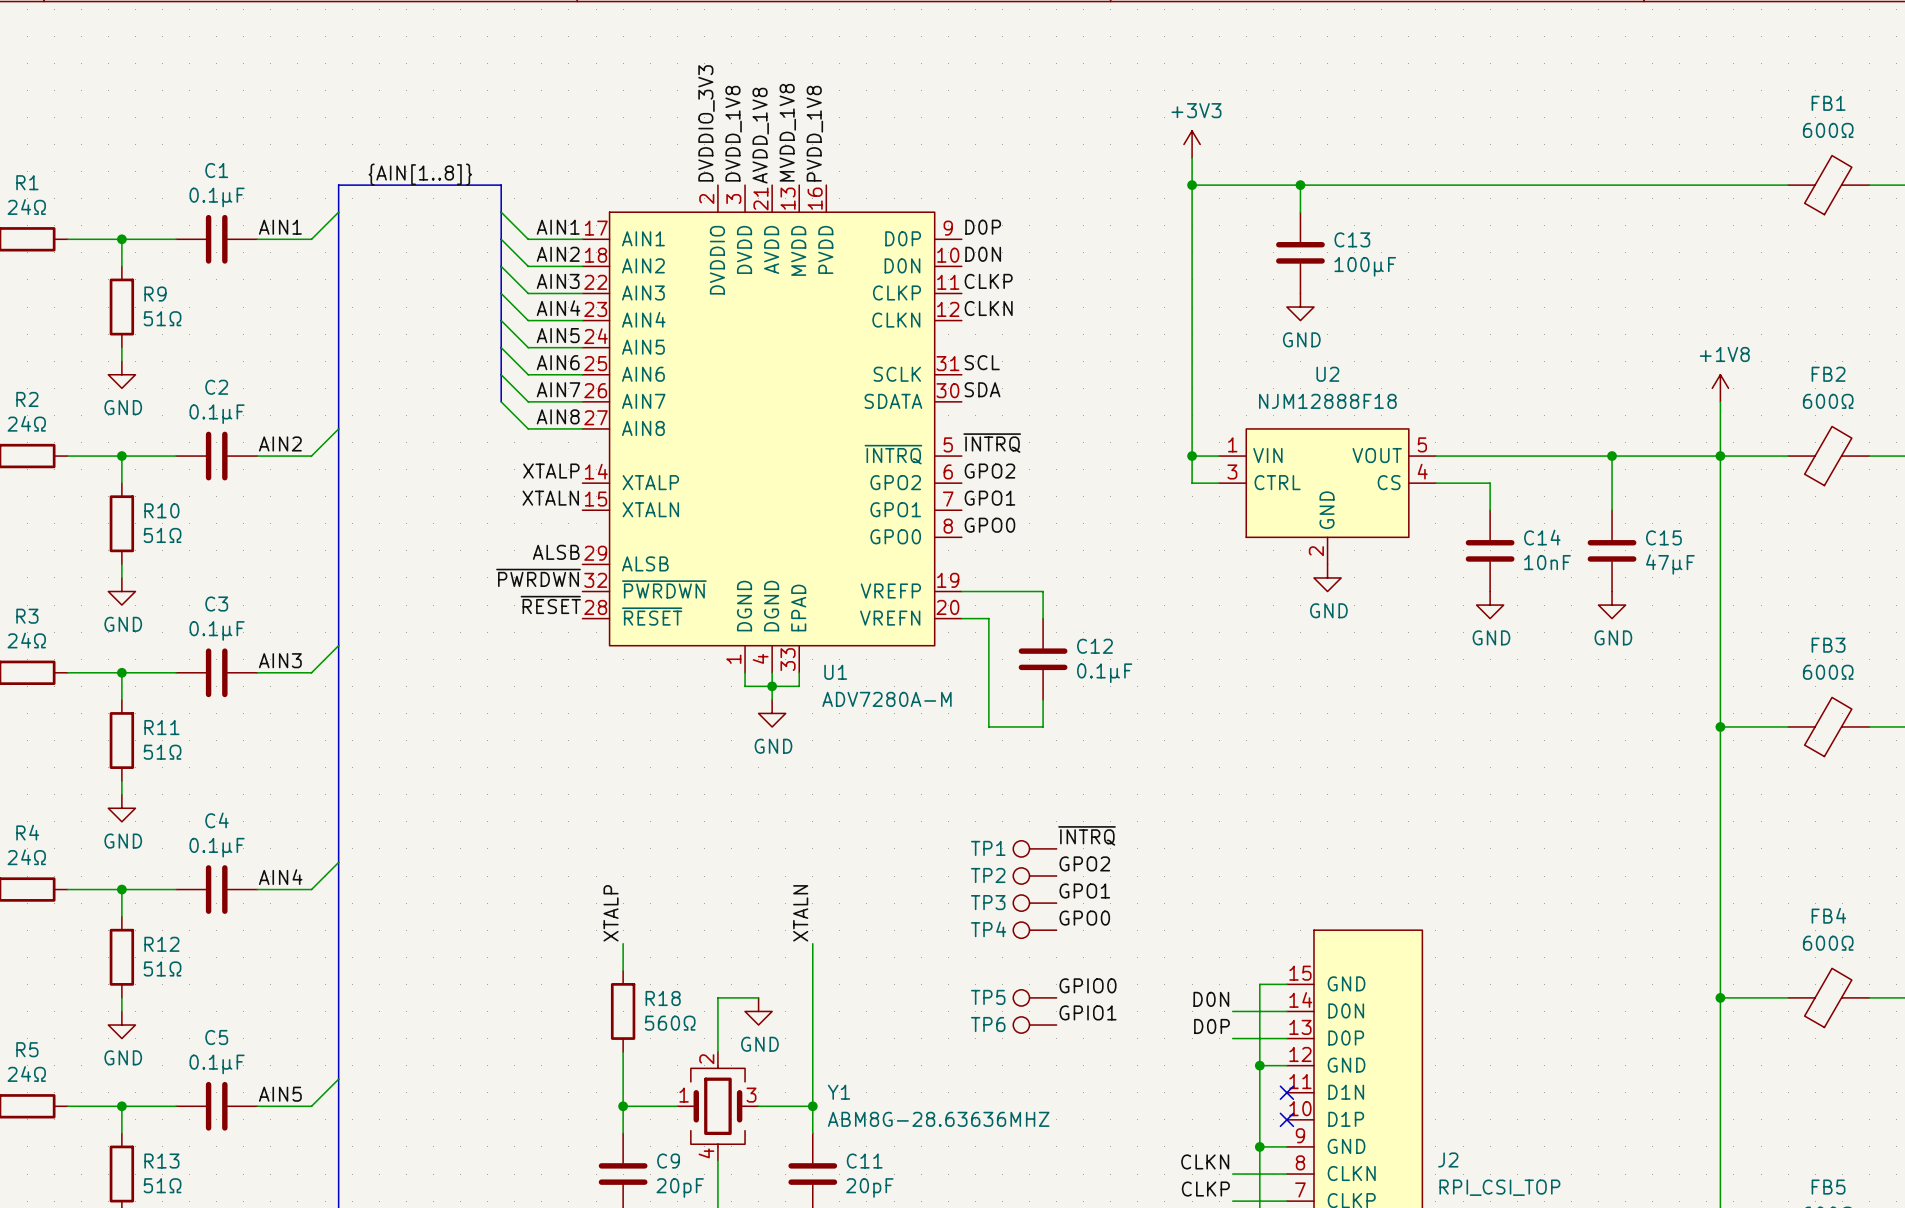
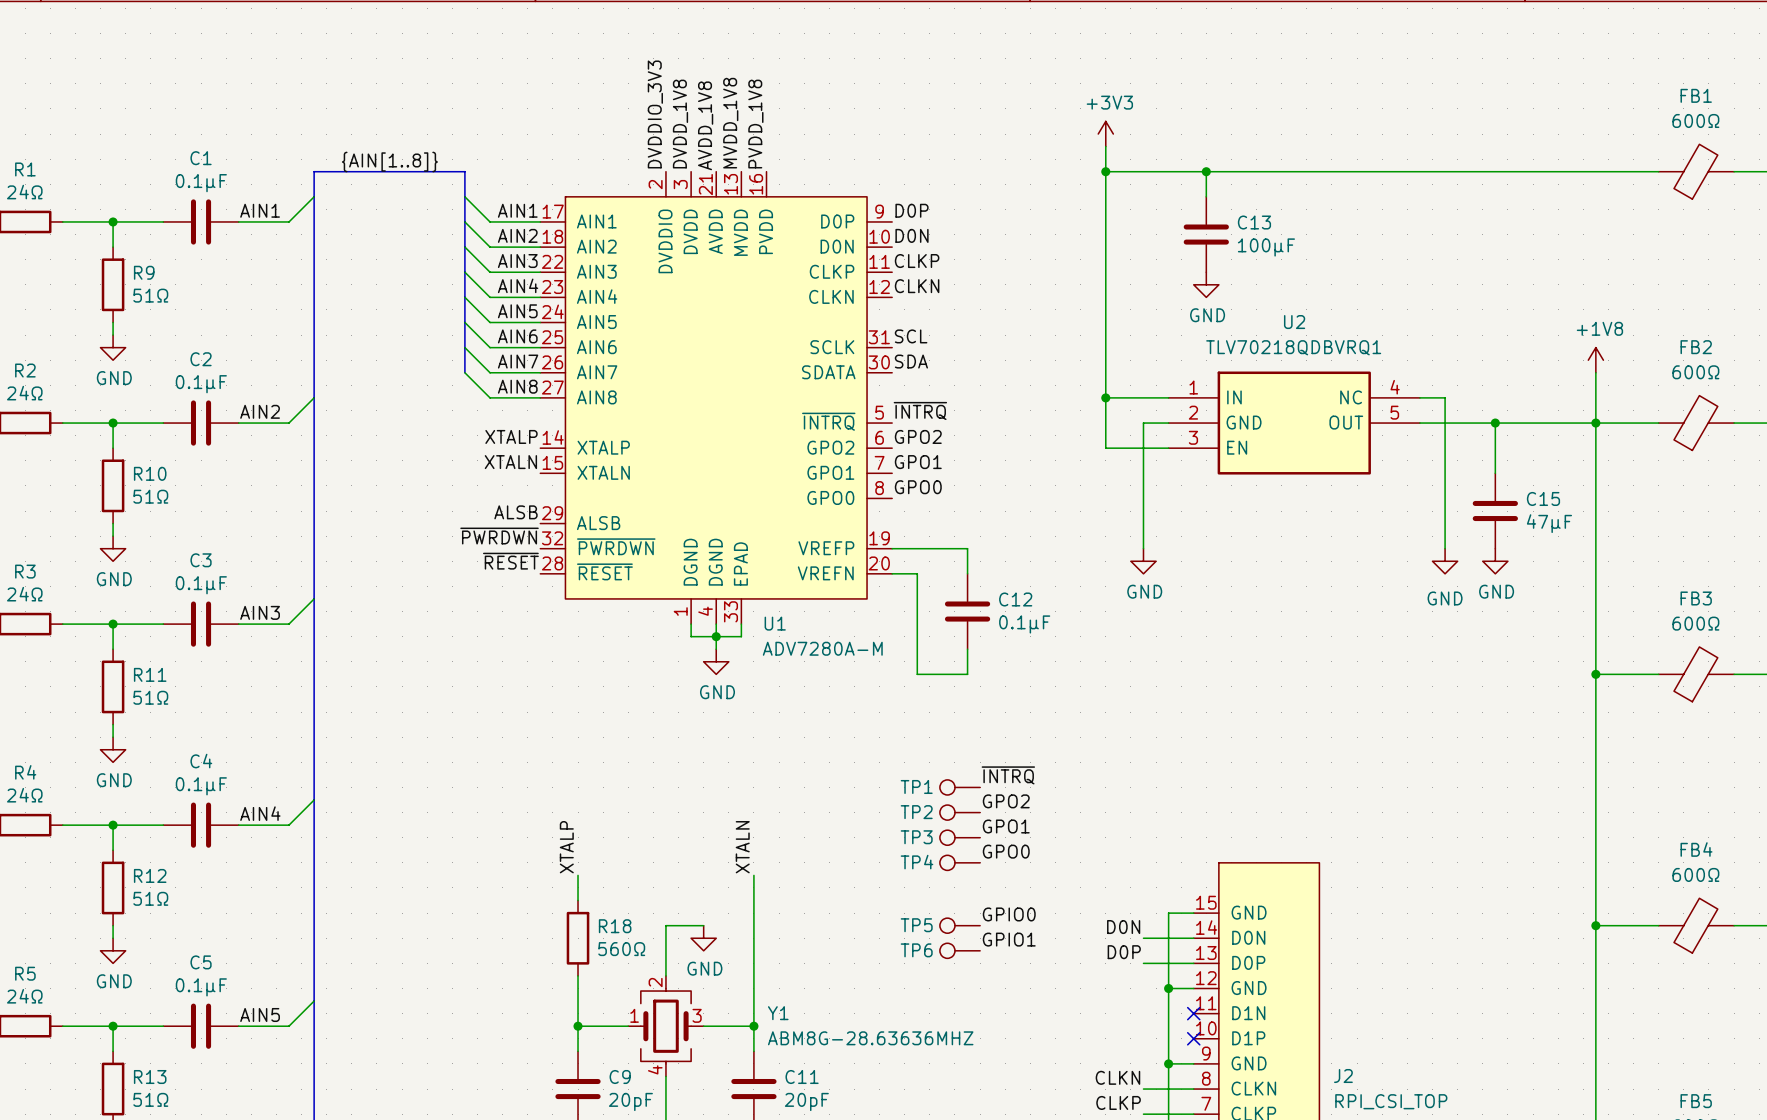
U2 value: NJM12888F18 (1327, 401) -> TLV70218QDBVRQ1 (1293, 347)
wire: none -> (1105, 397) (1168, 397)
U2 symbol: [1219, 428, 1436, 565] -> [1168, 371, 1420, 475]
wire: none -> (1419, 397) (1445, 397) (1445, 548)
wire: (1192, 456) (1219, 456) -> none
junction position: (1192, 456) -> (1105, 397)
wire: none -> (1168, 423) (1143, 423) (1143, 548)
wire: (1435, 483) (1490, 483) (1490, 510) -> none
C14: 10nF (1490, 550) -> none
power symbol position: GND (1327, 577) -> GND (1143, 561)
power symbol position: GND (1490, 605) -> GND (1445, 561)
power symbol text position: GND (1491, 637) -> GND (1445, 598)

